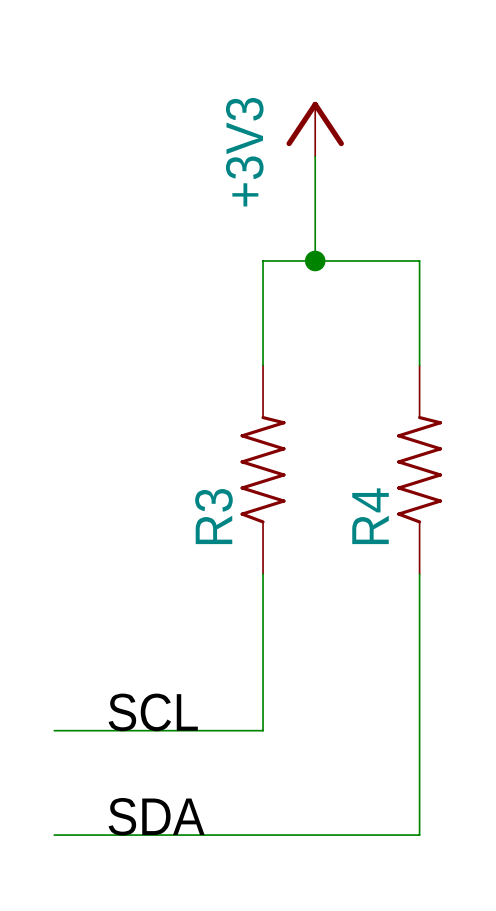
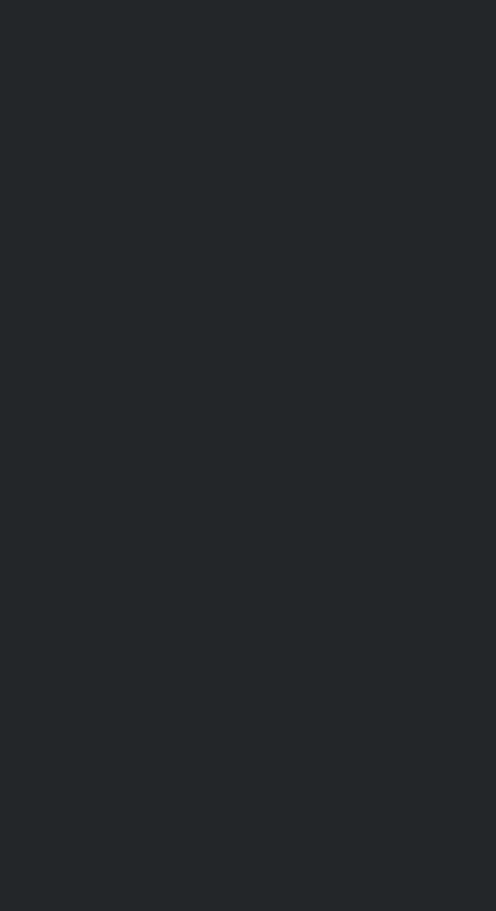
power symbol: +3V3 (315, 129) -> none
wire: (315, 156) (315, 260) -> none
junction: (315, 260) -> none
wire: (263, 365) (263, 260) (419, 260) (419, 365) -> none
R3: (263, 469) -> none
R4: (419, 469) -> none
wire: (263, 574) (263, 730) (54, 730) -> none
wire: (419, 574) (419, 835) (54, 835) -> none
label: SCL (153, 712) -> none
label: SDA (156, 816) -> none

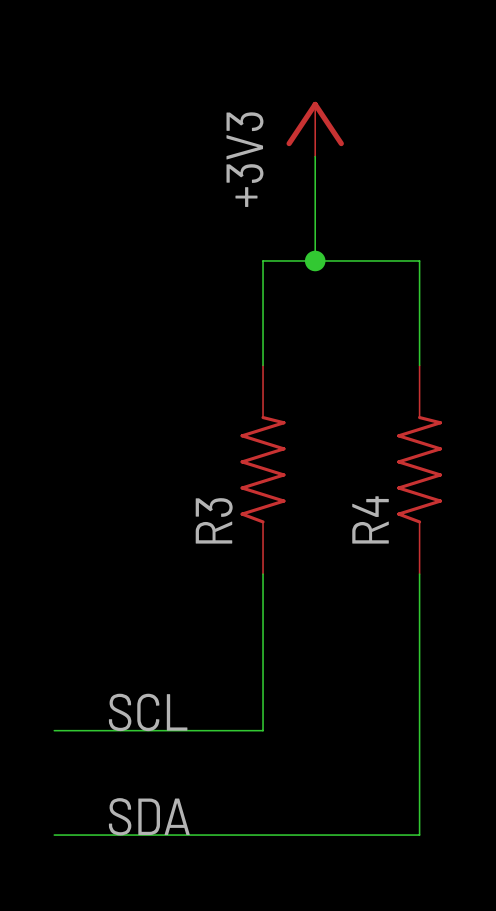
power symbol: none -> +3V3 (315, 129)
wire: none -> (315, 156) (315, 260)
junction: none -> (315, 260)
wire: none -> (263, 365) (263, 260) (419, 260) (419, 365)
R3: none -> (263, 469)
R4: none -> (419, 469)
wire: none -> (263, 574) (263, 730) (54, 730)
wire: none -> (419, 574) (419, 835) (54, 835)
label: none -> SCL (148, 712)
label: none -> SDA (149, 816)

